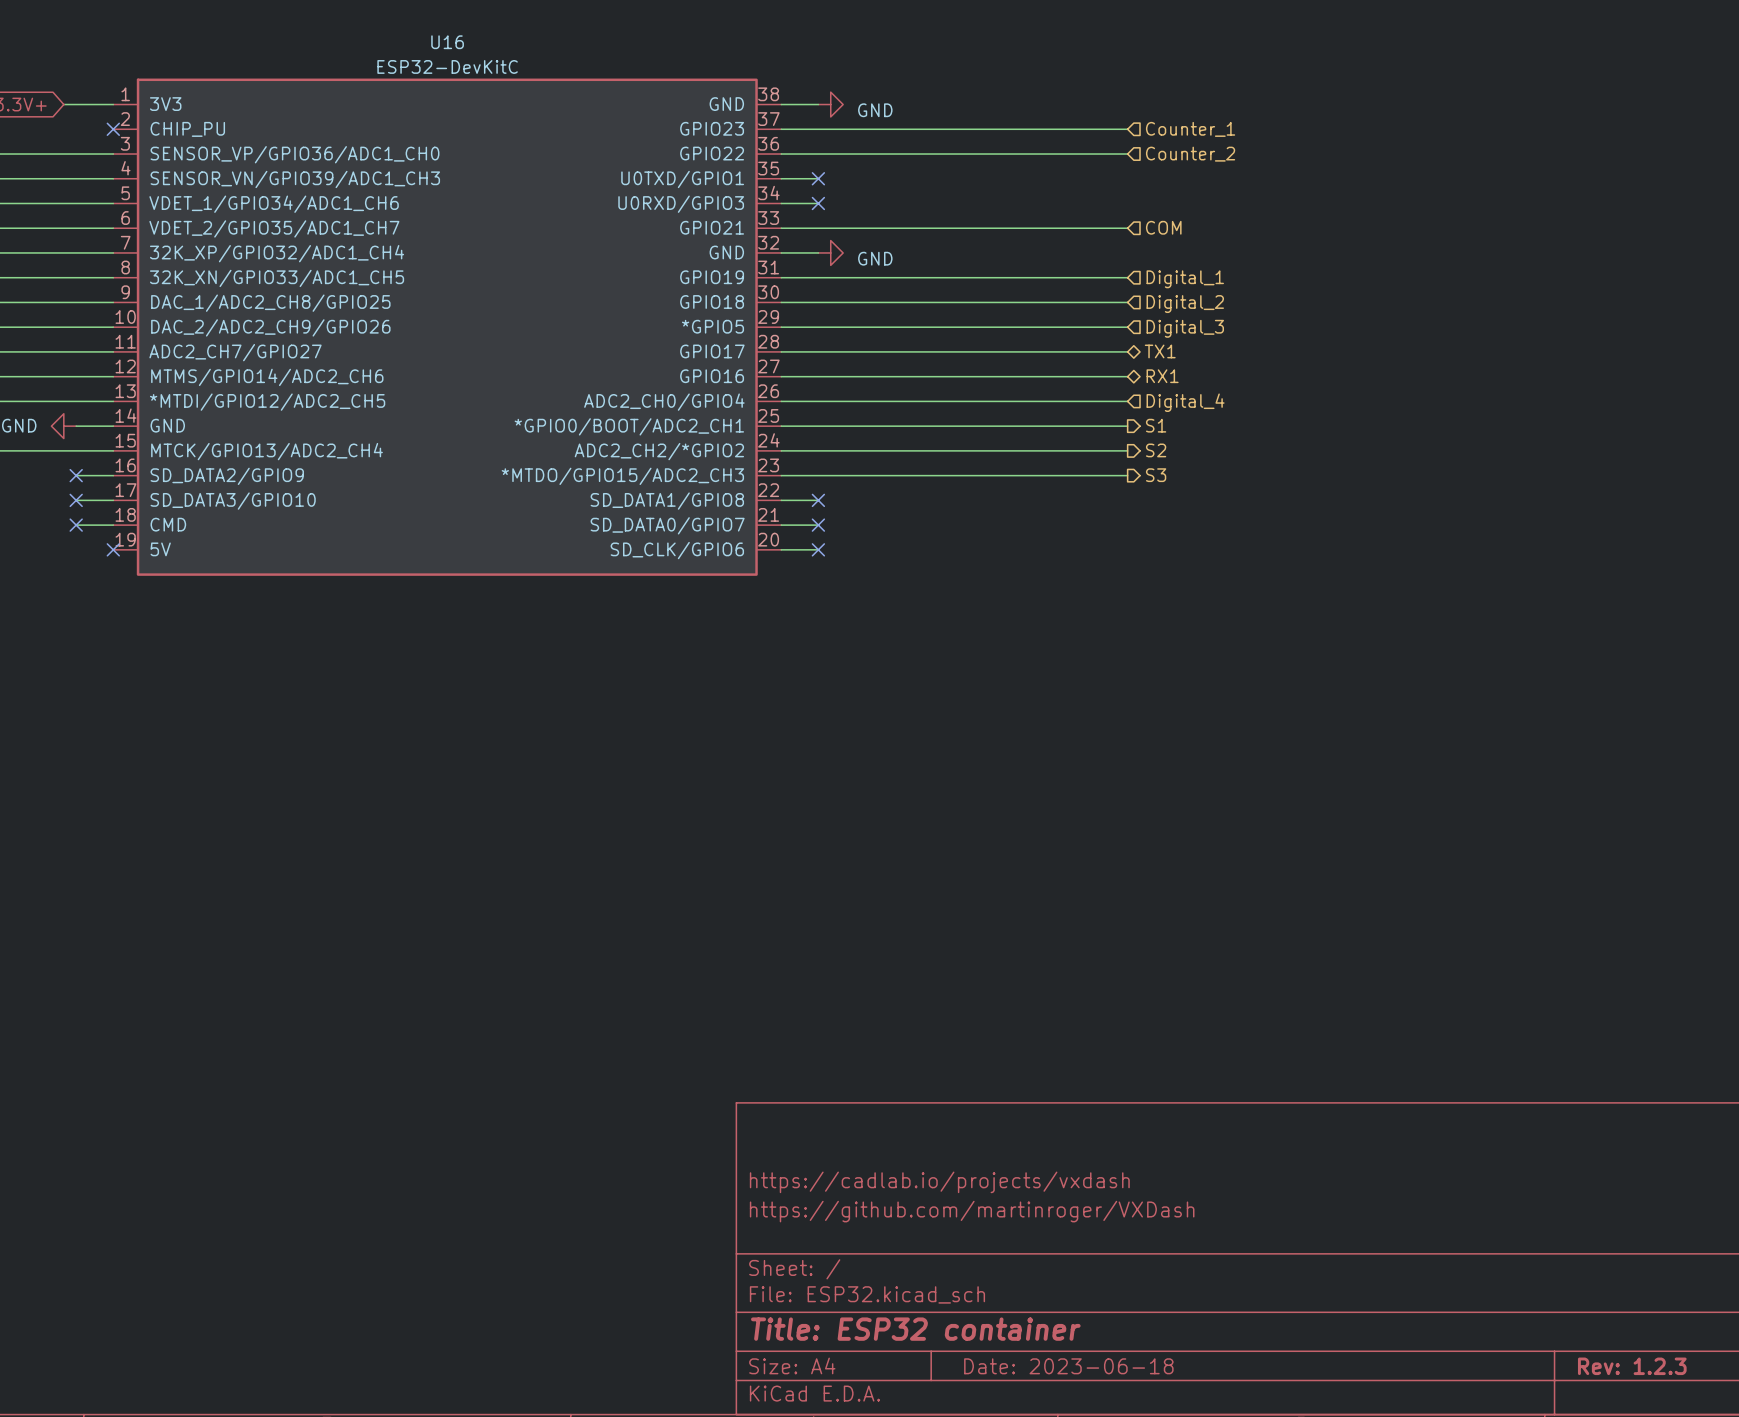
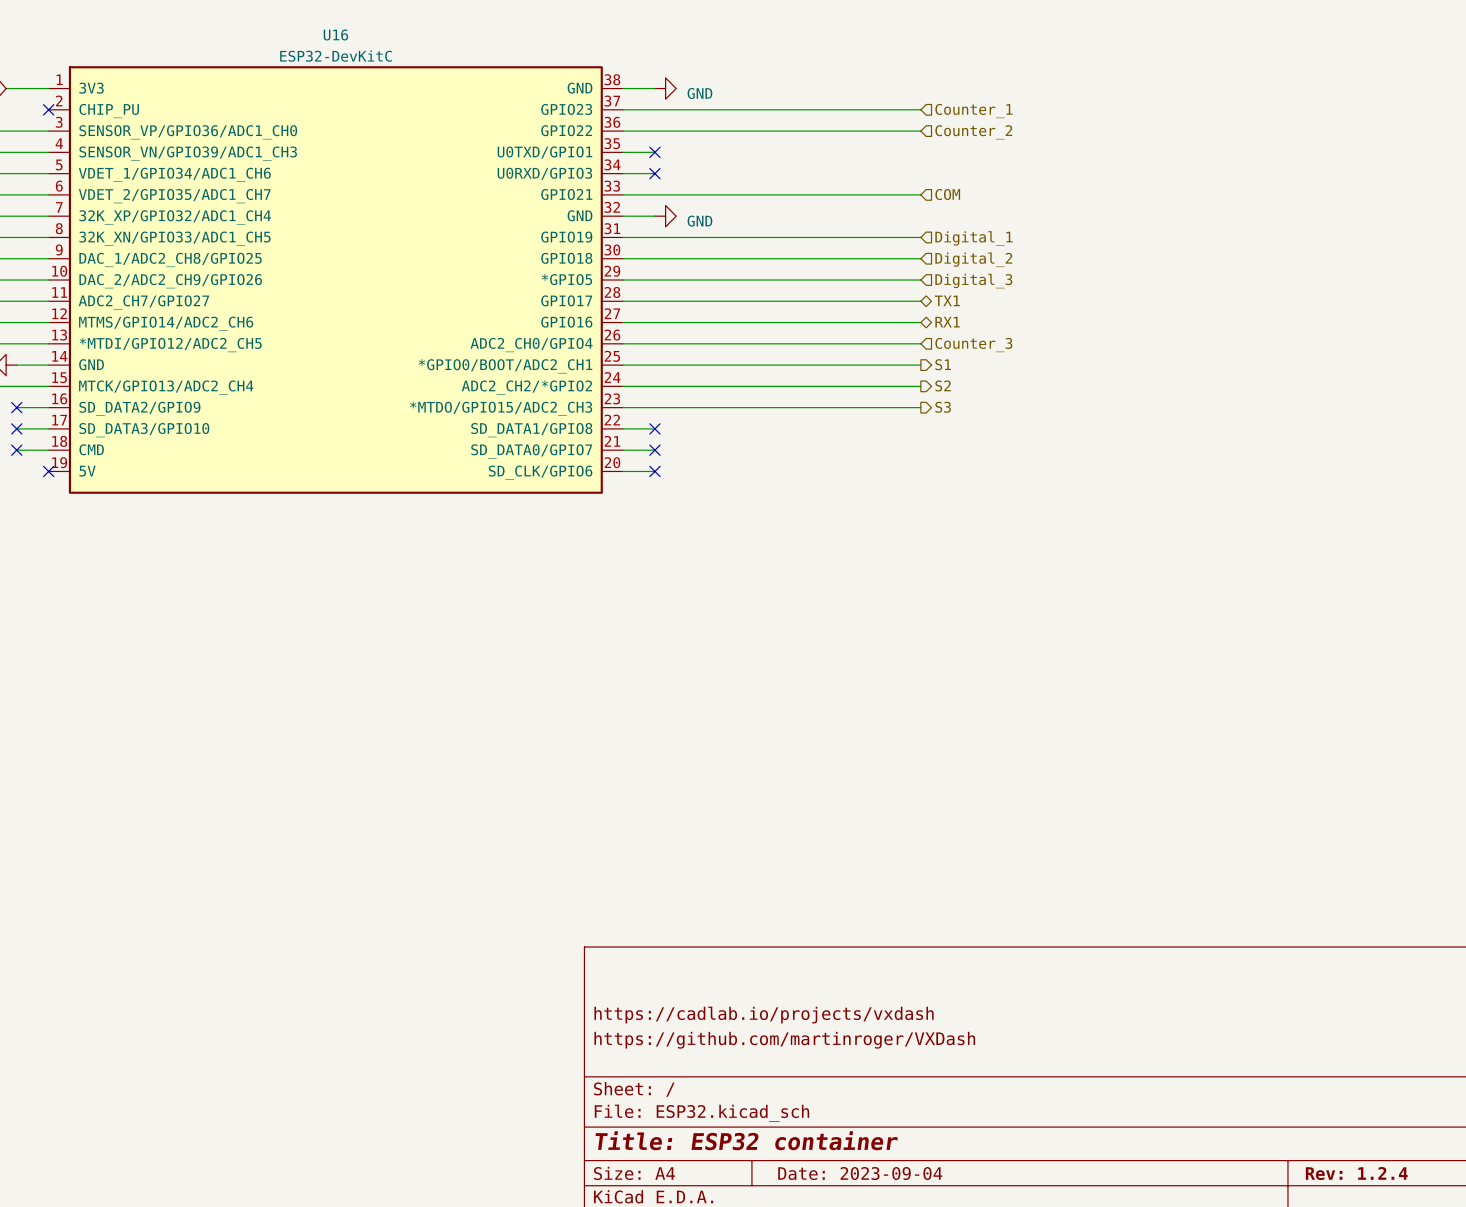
hierarchical label: Digital_4 (1185, 402) -> Counter_3 (973, 345)
title block: Date: 2023-06-18 (1068, 1366) -> Date: 2023-09-04 (860, 1173)
title block: Rev: 1.2.3 (1632, 1366) -> Rev: 1.2.4 (1356, 1173)

